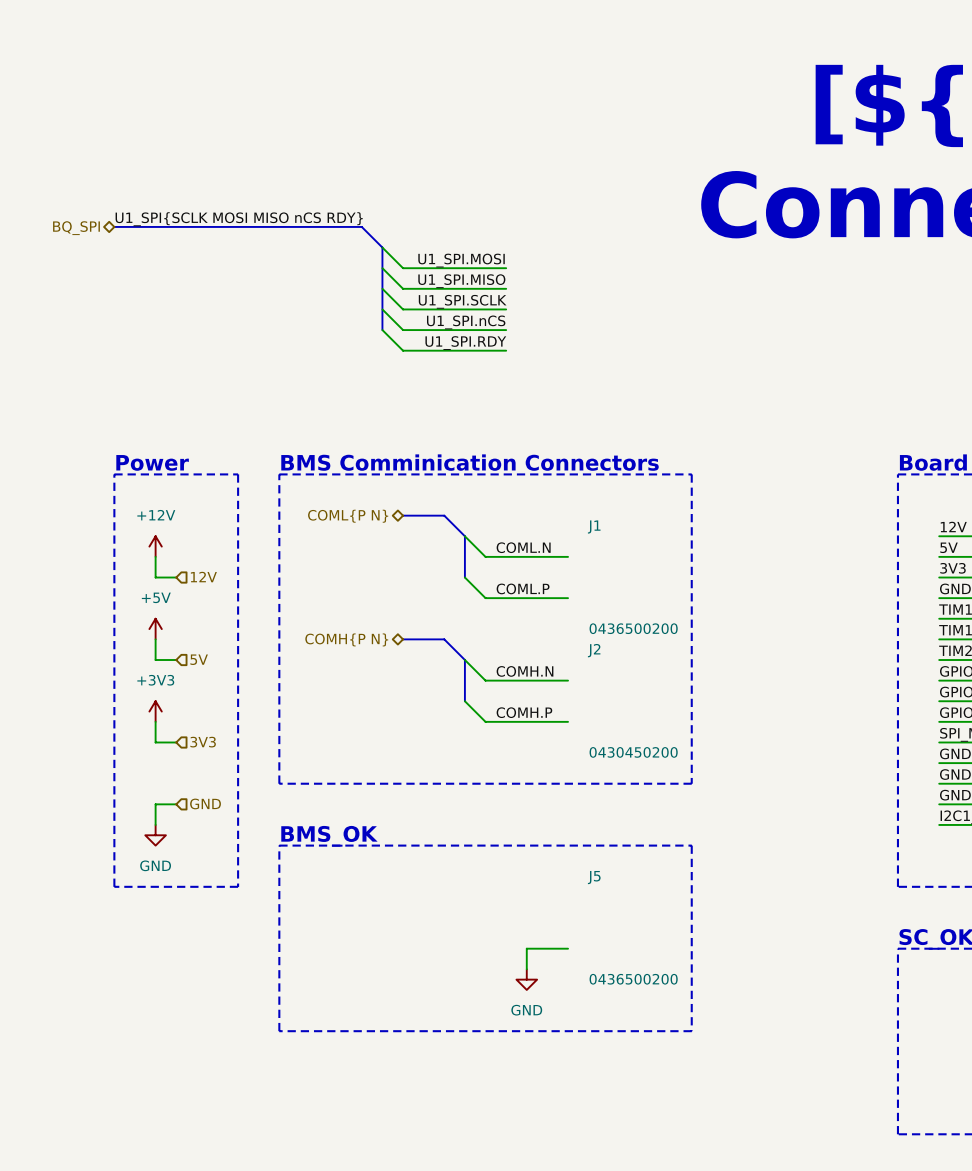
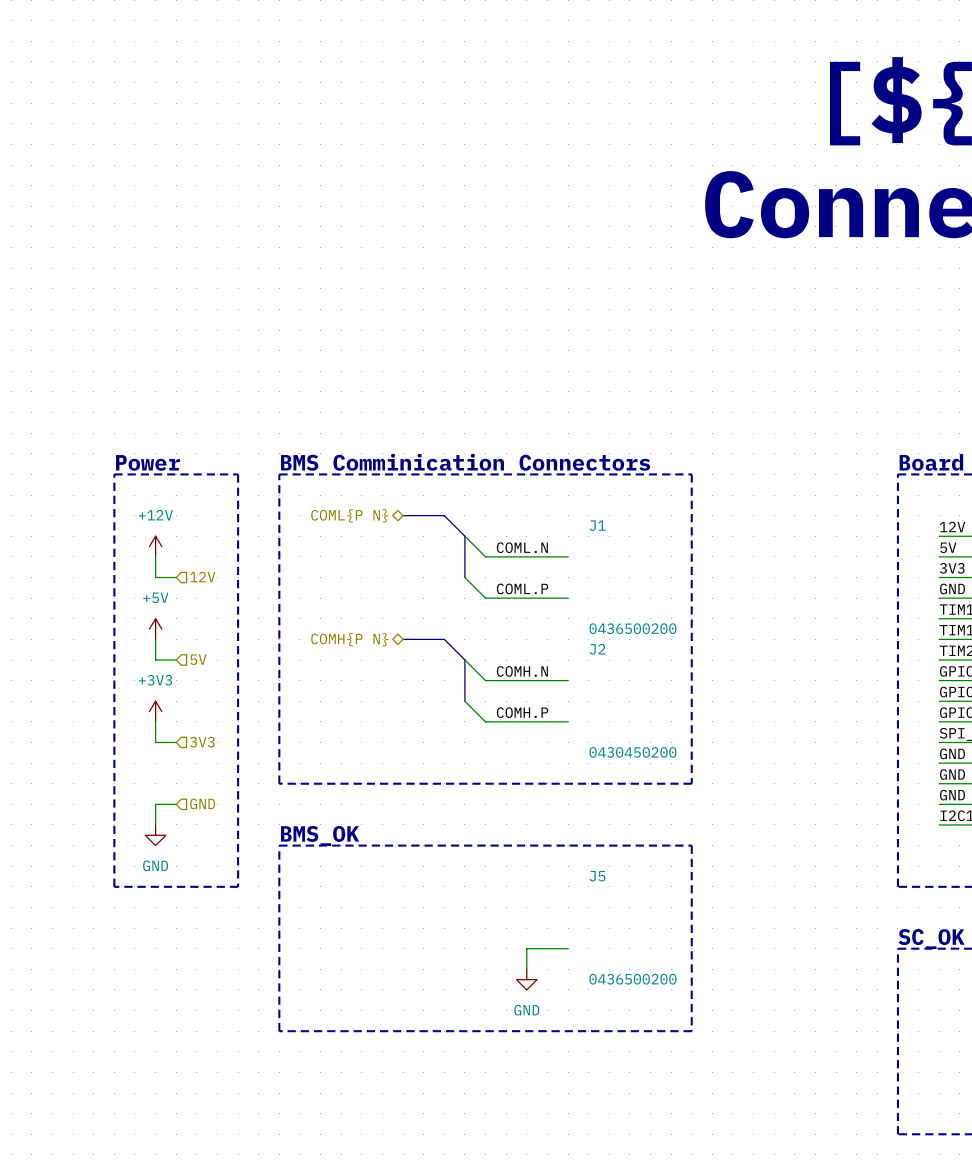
label: U1_SPI{SCLK MOSI MISO nCS RDY} (239, 219) -> none
bus: (114, 226) (361, 226) (382, 247) (382, 330) -> none
hierarchical label: BQ_SPI (76, 228) -> none
wire: (382, 247) (403, 268) (506, 268) -> none
label: U1_SPI.MOSI (461, 260) -> none
wire: (382, 268) (403, 288) (506, 288) -> none
label: U1_SPI.MISO (461, 281) -> none
wire: (382, 288) (403, 309) (506, 309) -> none
label: U1_SPI.SCLK (462, 301) -> none
wire: (382, 309) (403, 330) (506, 330) -> none
label: U1_SPI.nCS (466, 322) -> none
wire: (382, 330) (403, 350) (506, 350) -> none
label: U1_SPI.RDY (465, 343) -> none

